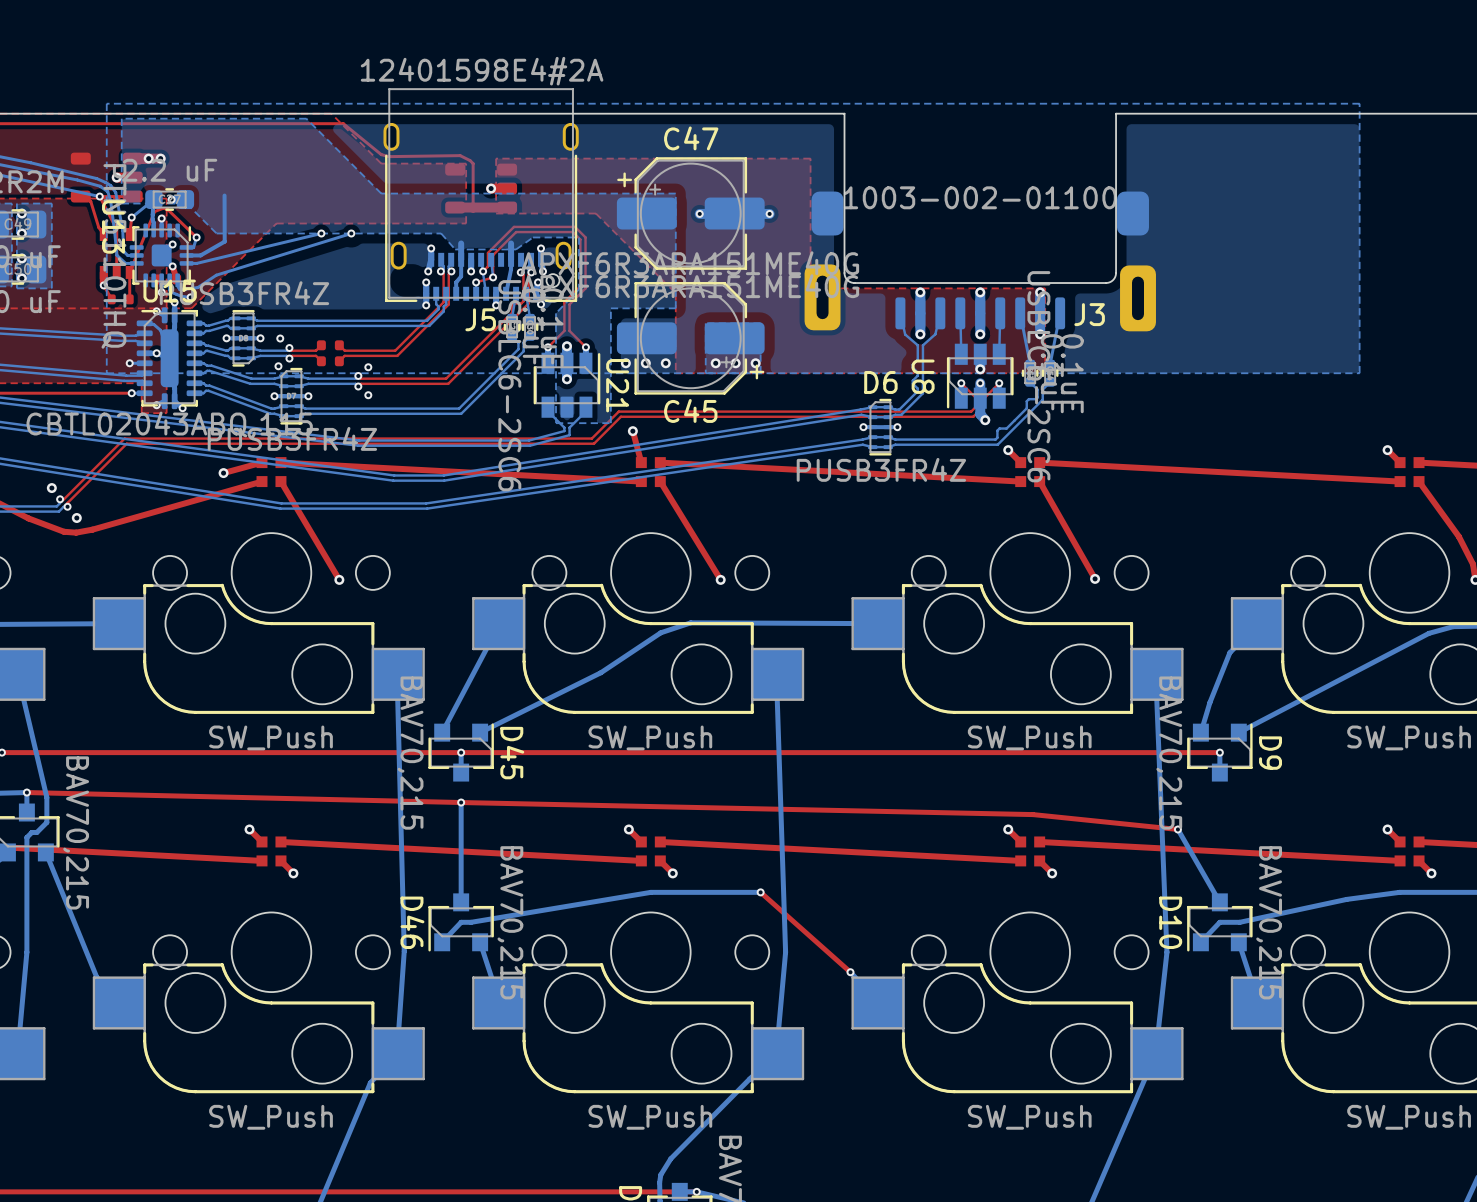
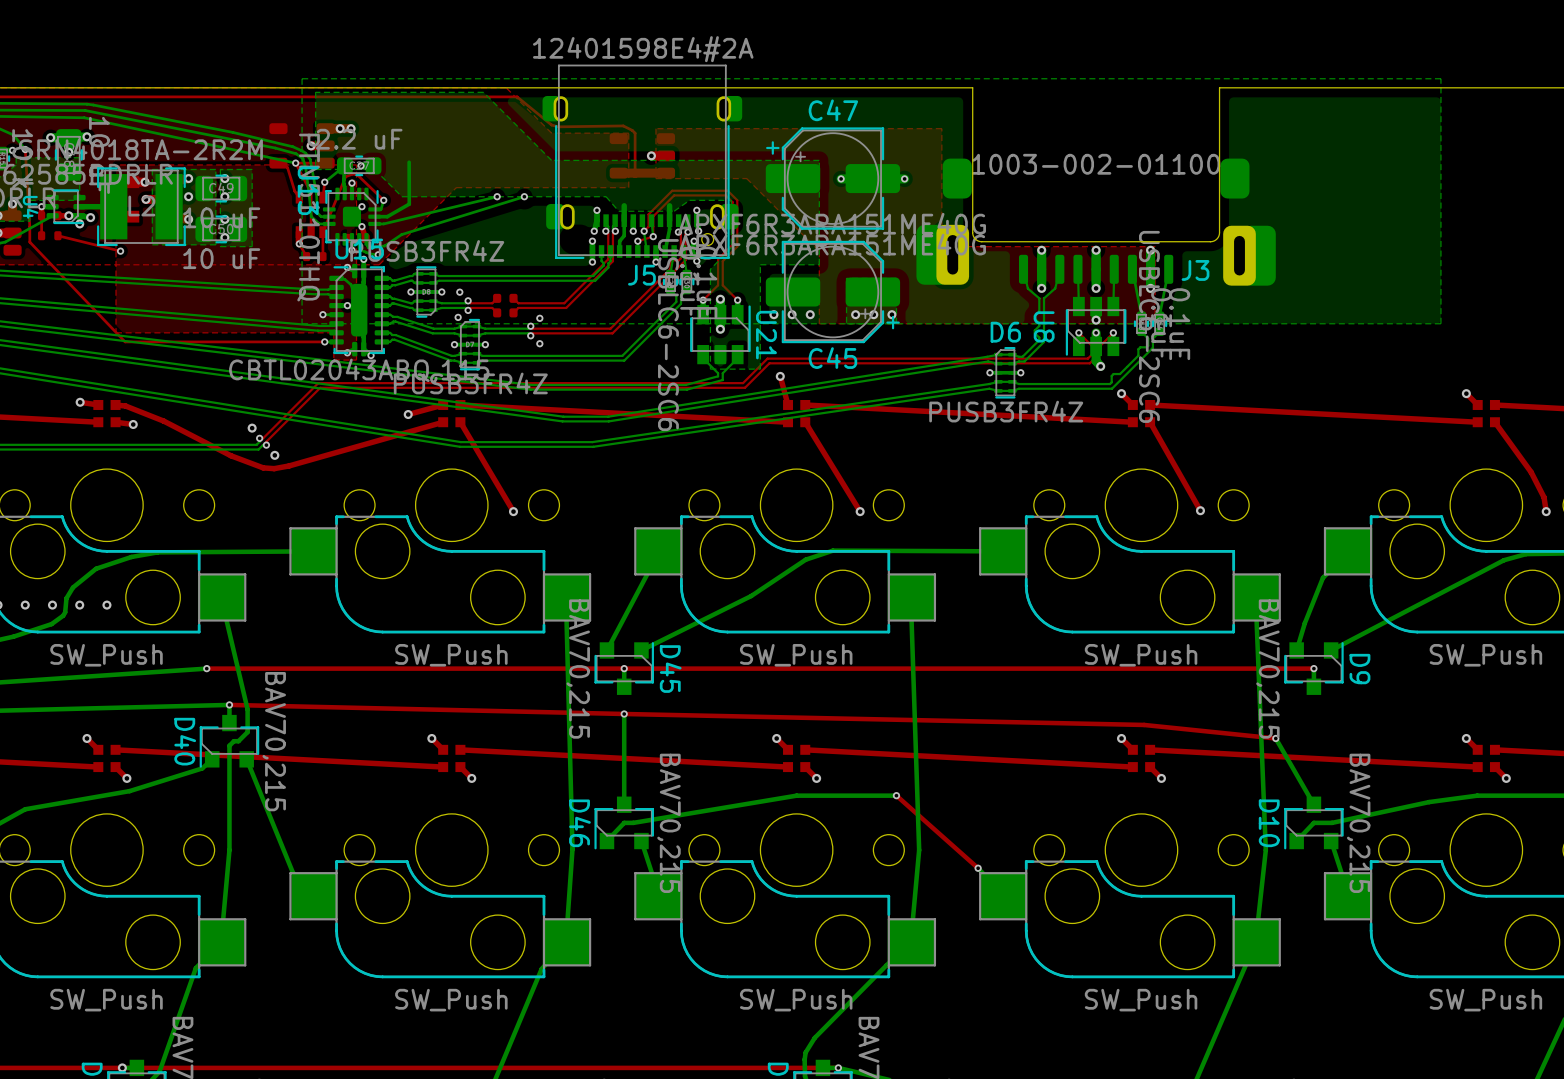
J5 footprint: [383, 88, 579, 302] -> [542, 64, 743, 259]
J3 footprint: [804, 113, 1156, 332] -> [916, 87, 1276, 286]

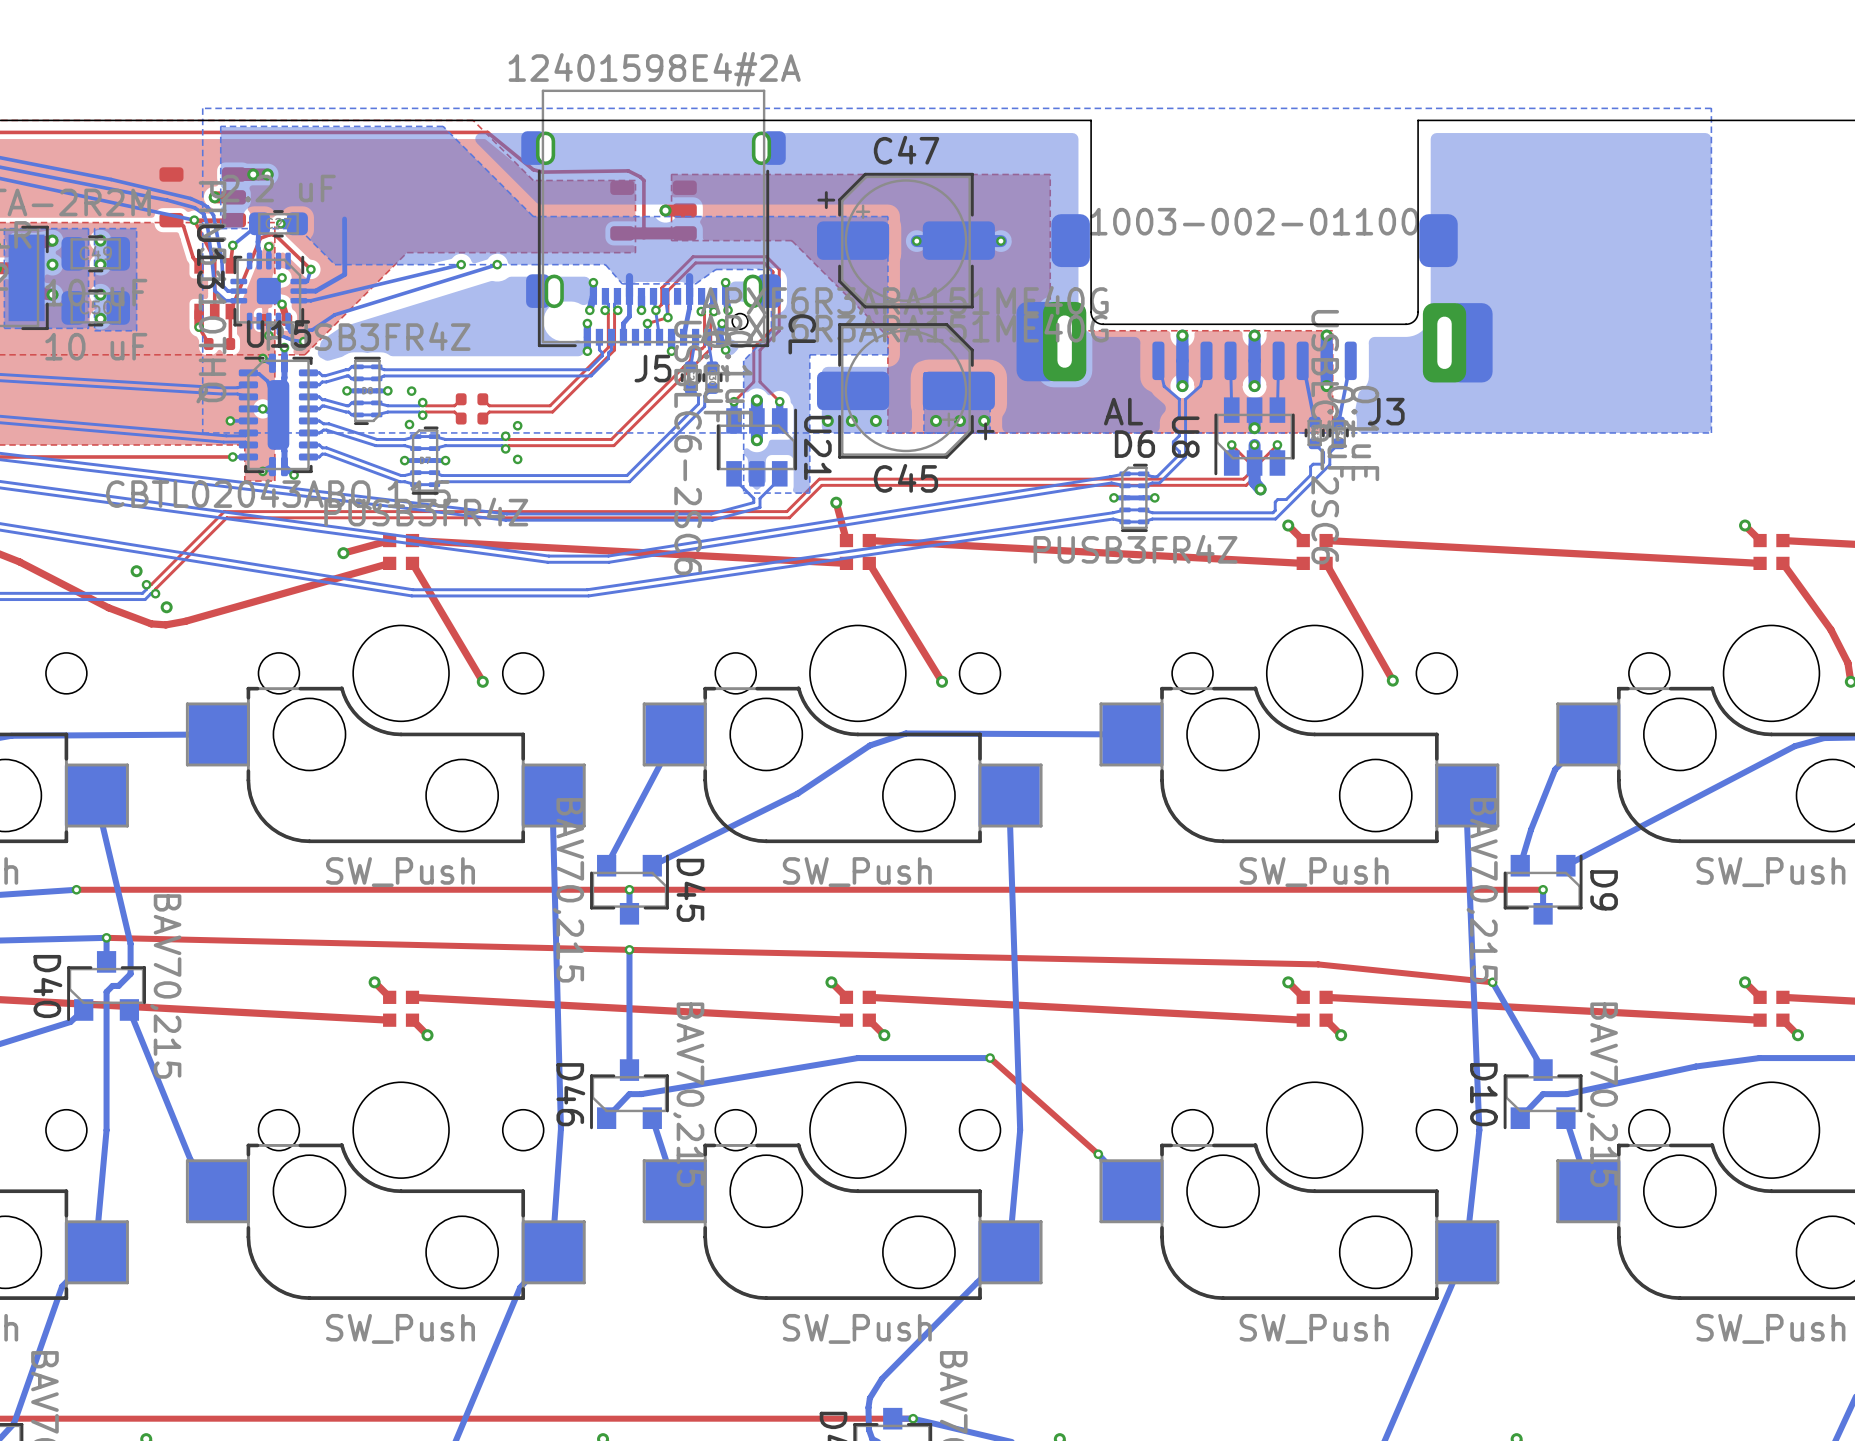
text: none -> CL (802, 334)
J3 name position: J3 (1195, 270) -> J3 (1386, 411)
text: none -> AL (1123, 411)

